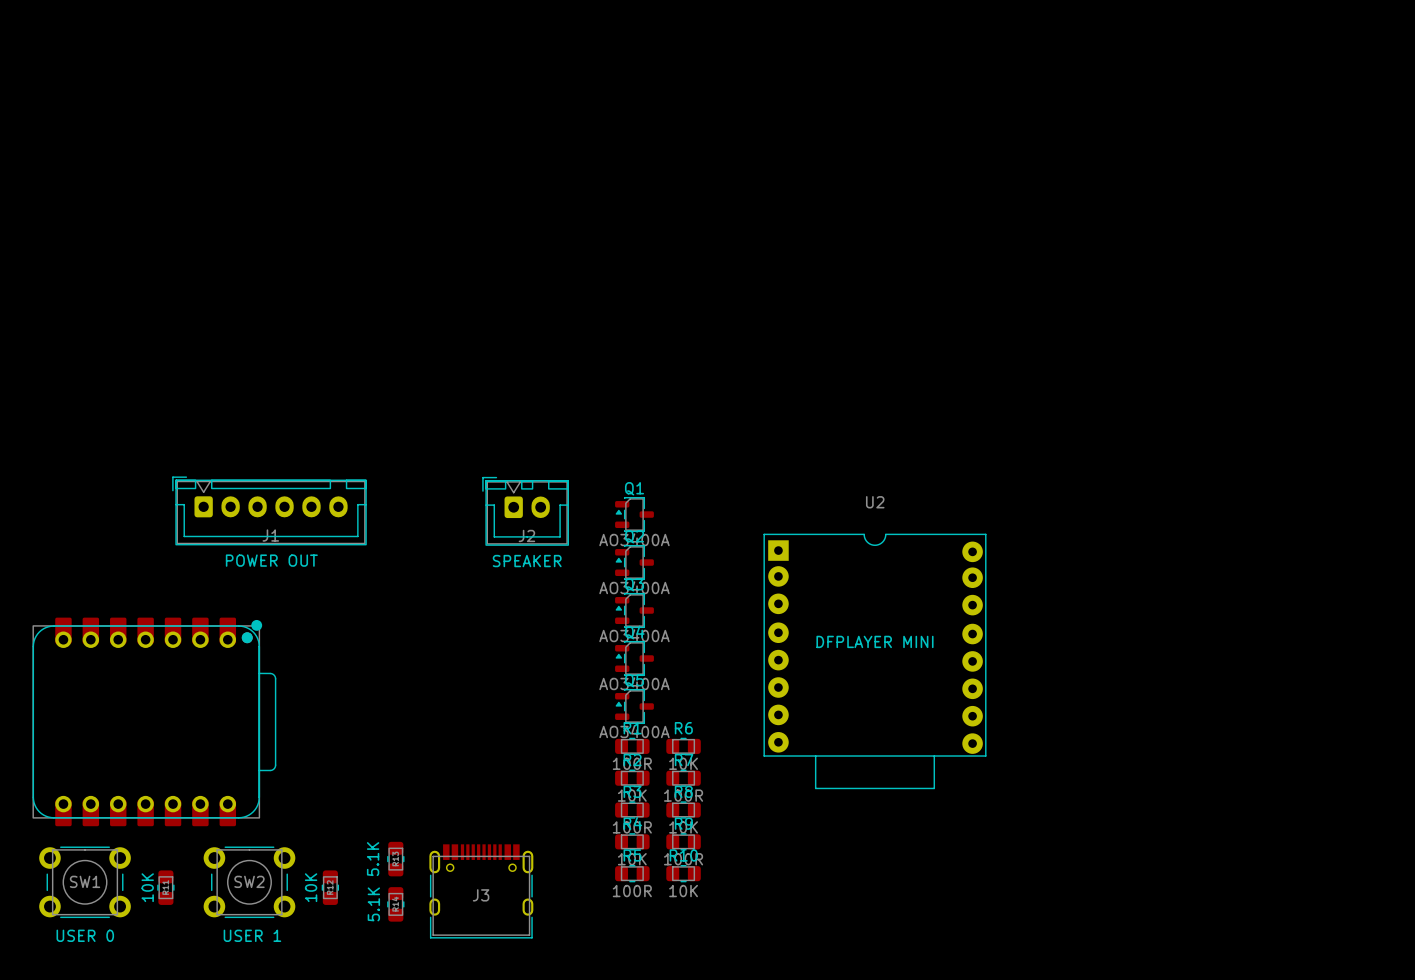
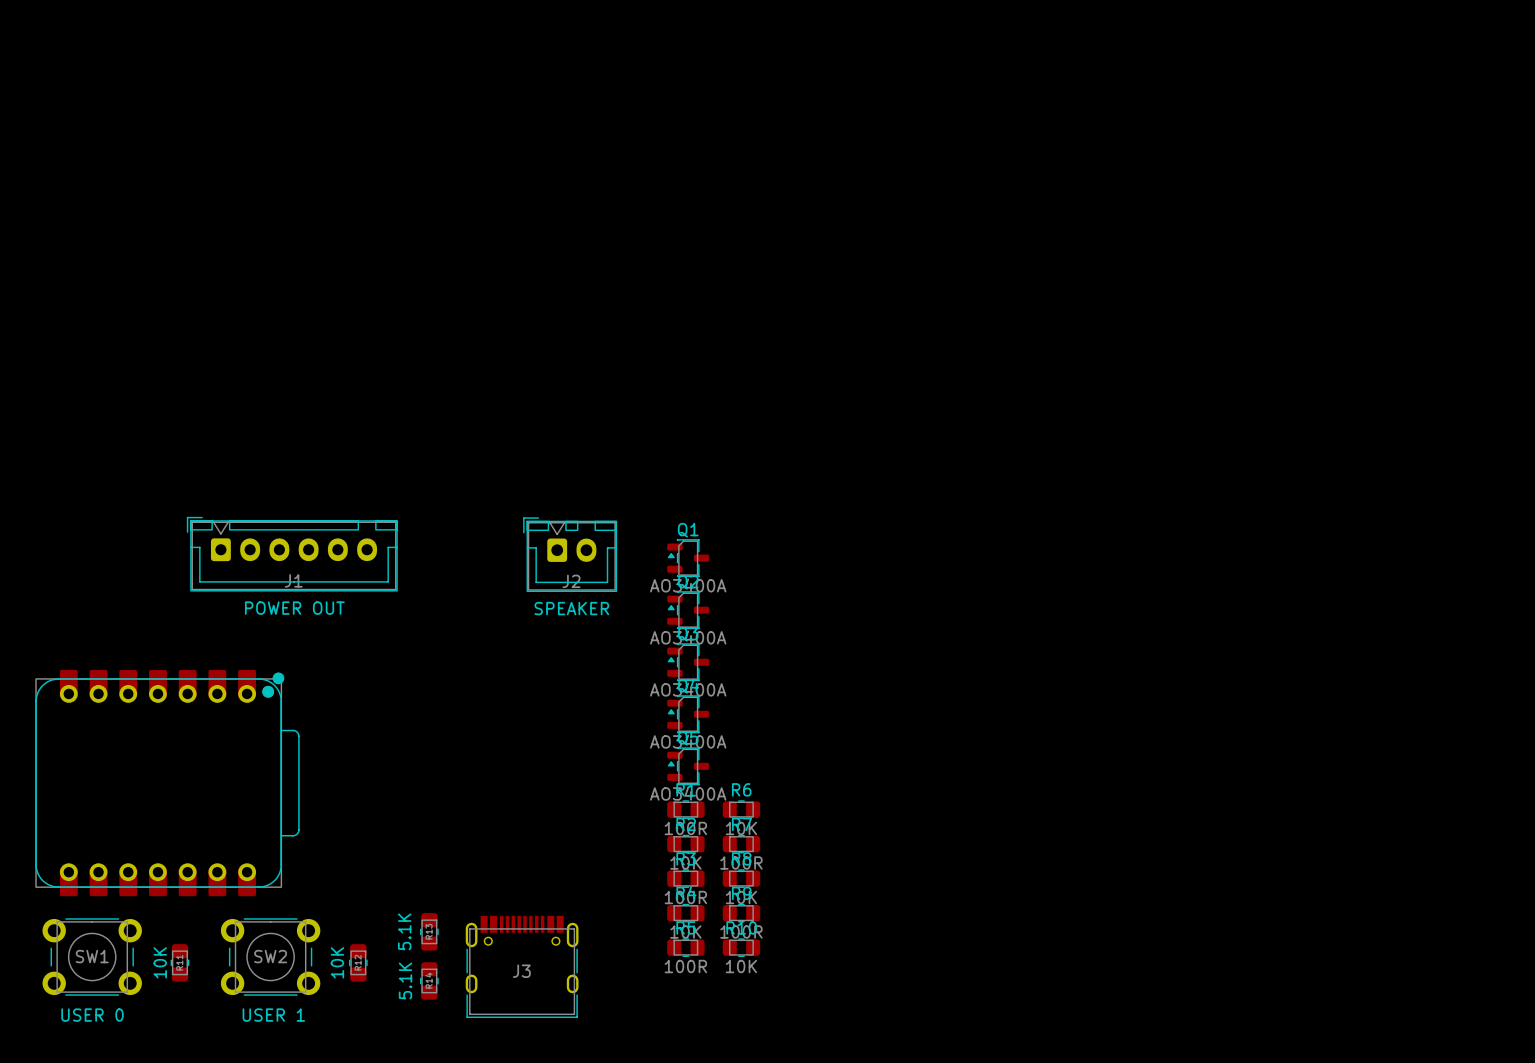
U2: DFPLAYER MINI (874, 661) -> none

